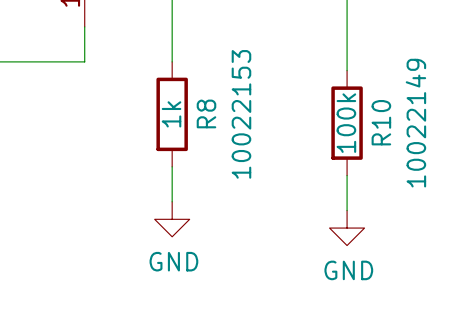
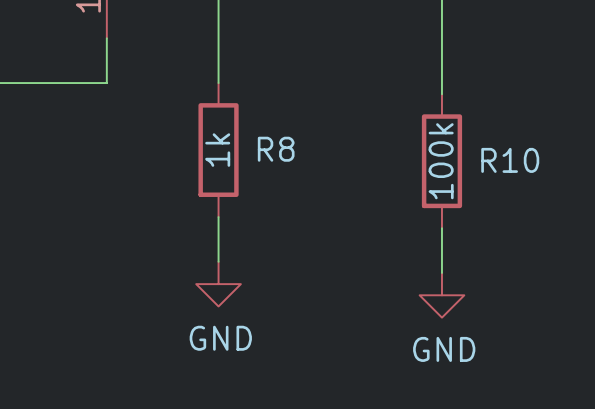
R8 name rotation: 0° (206, 113) -> 90° clockwise (276, 149)
R8 text: 10022153 (241, 114) -> none
R10 name rotation: 0° (381, 122) -> 90° clockwise (510, 160)
R10 text: 10022149 (415, 123) -> none

